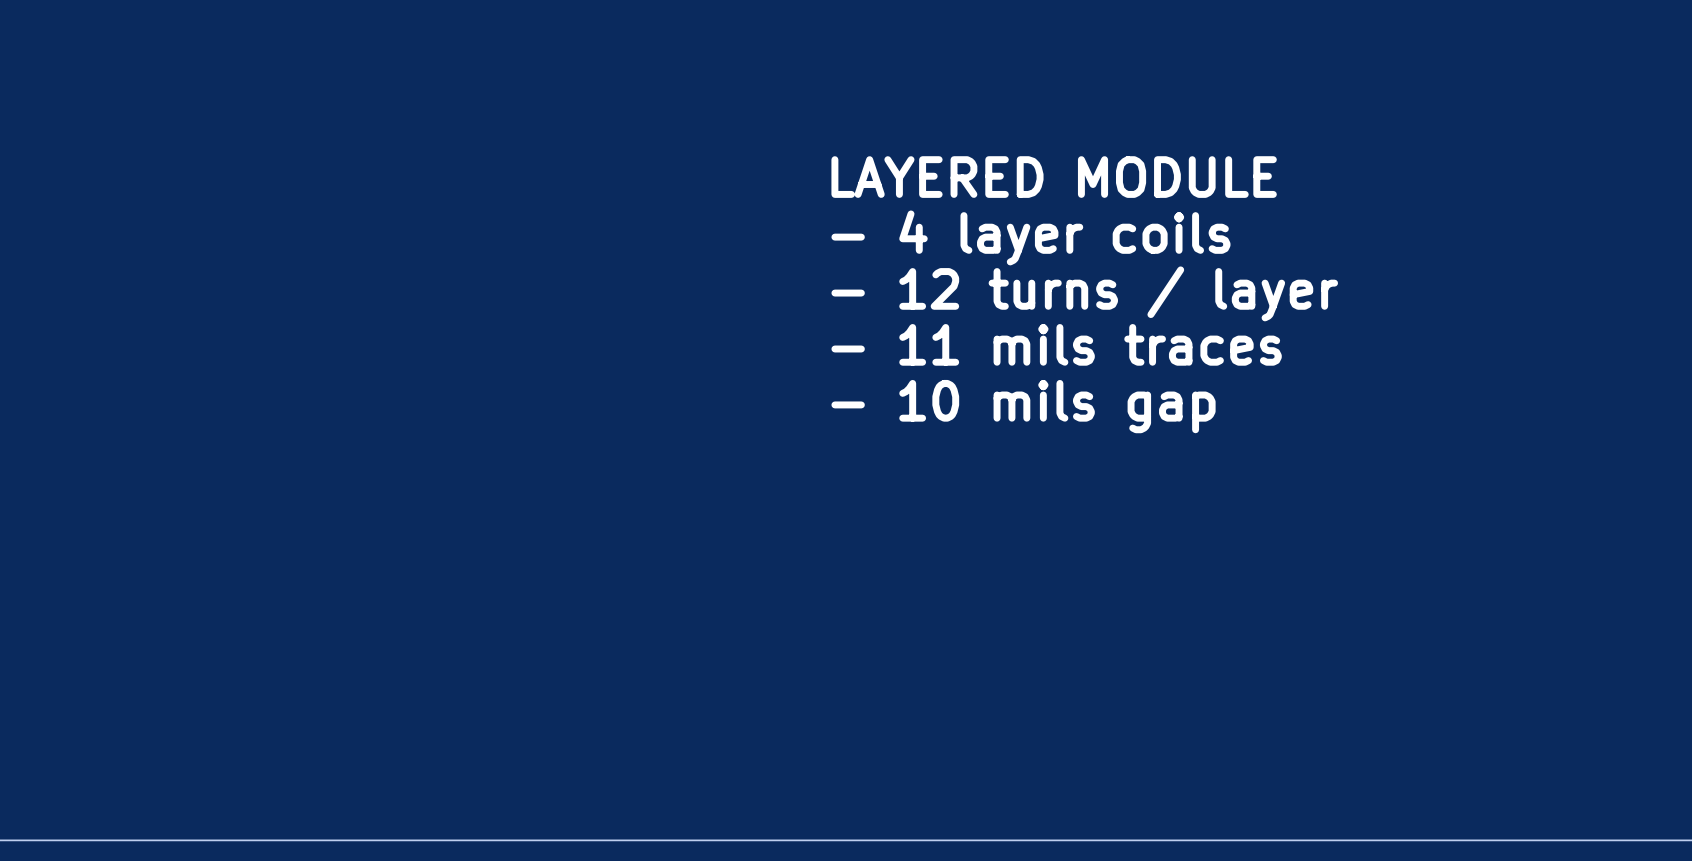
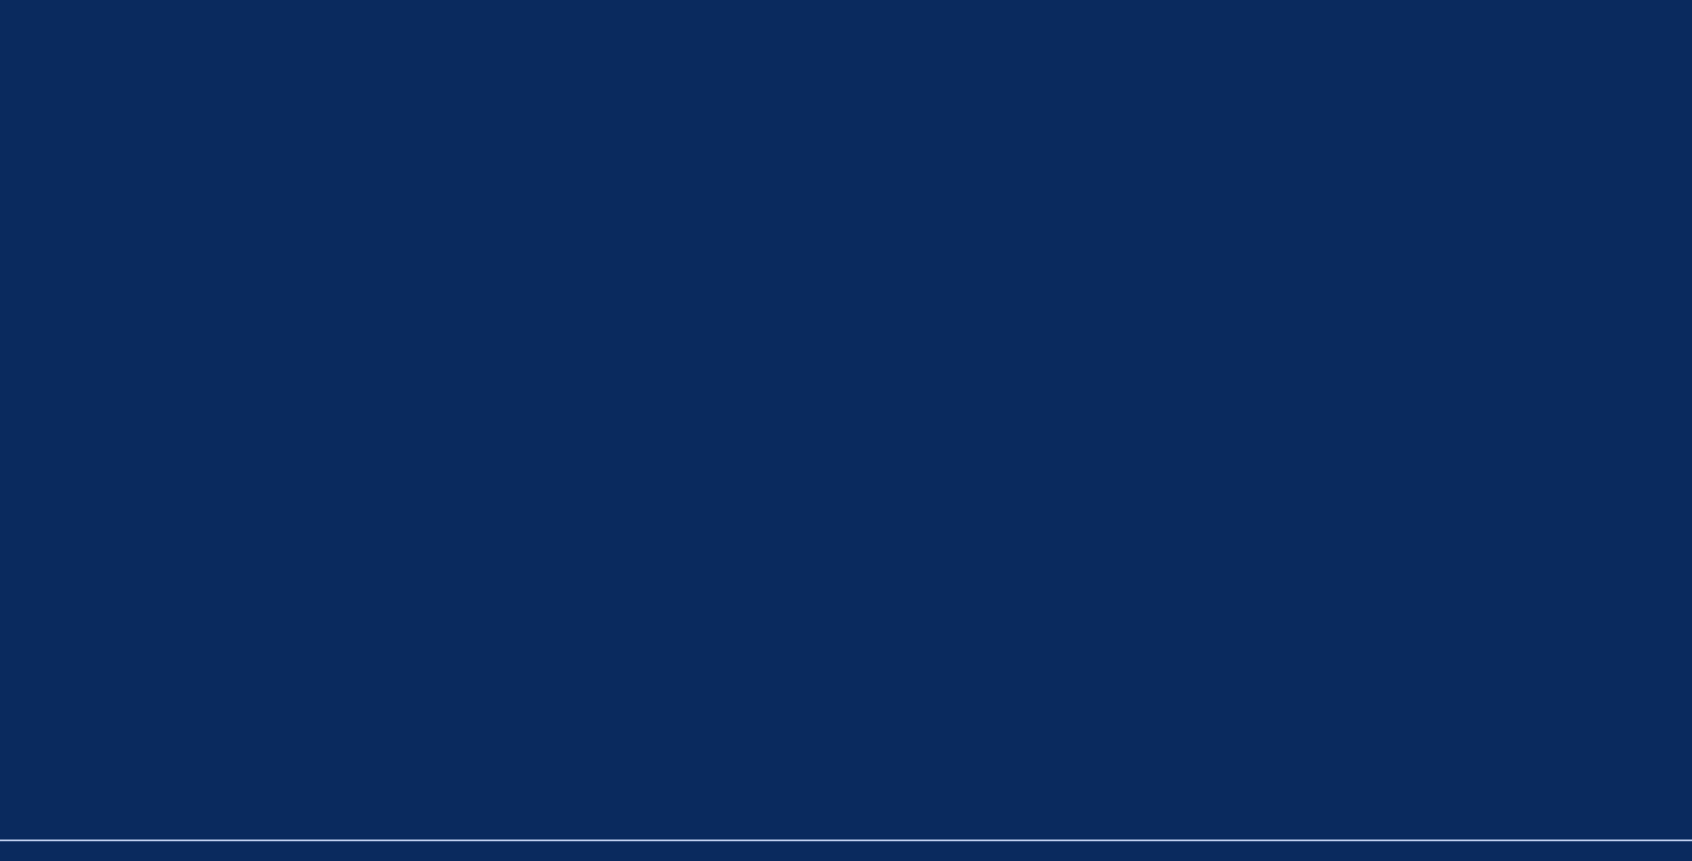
text: LAYERED MODULE (1054, 177) -> none
text: - 4 layer coils (1030, 237) -> none
text: - 12 turns / layer (1084, 293) -> none
text: - 11 mils traces (1056, 344) -> none
text: - 10 mils gap (1023, 406) -> none

